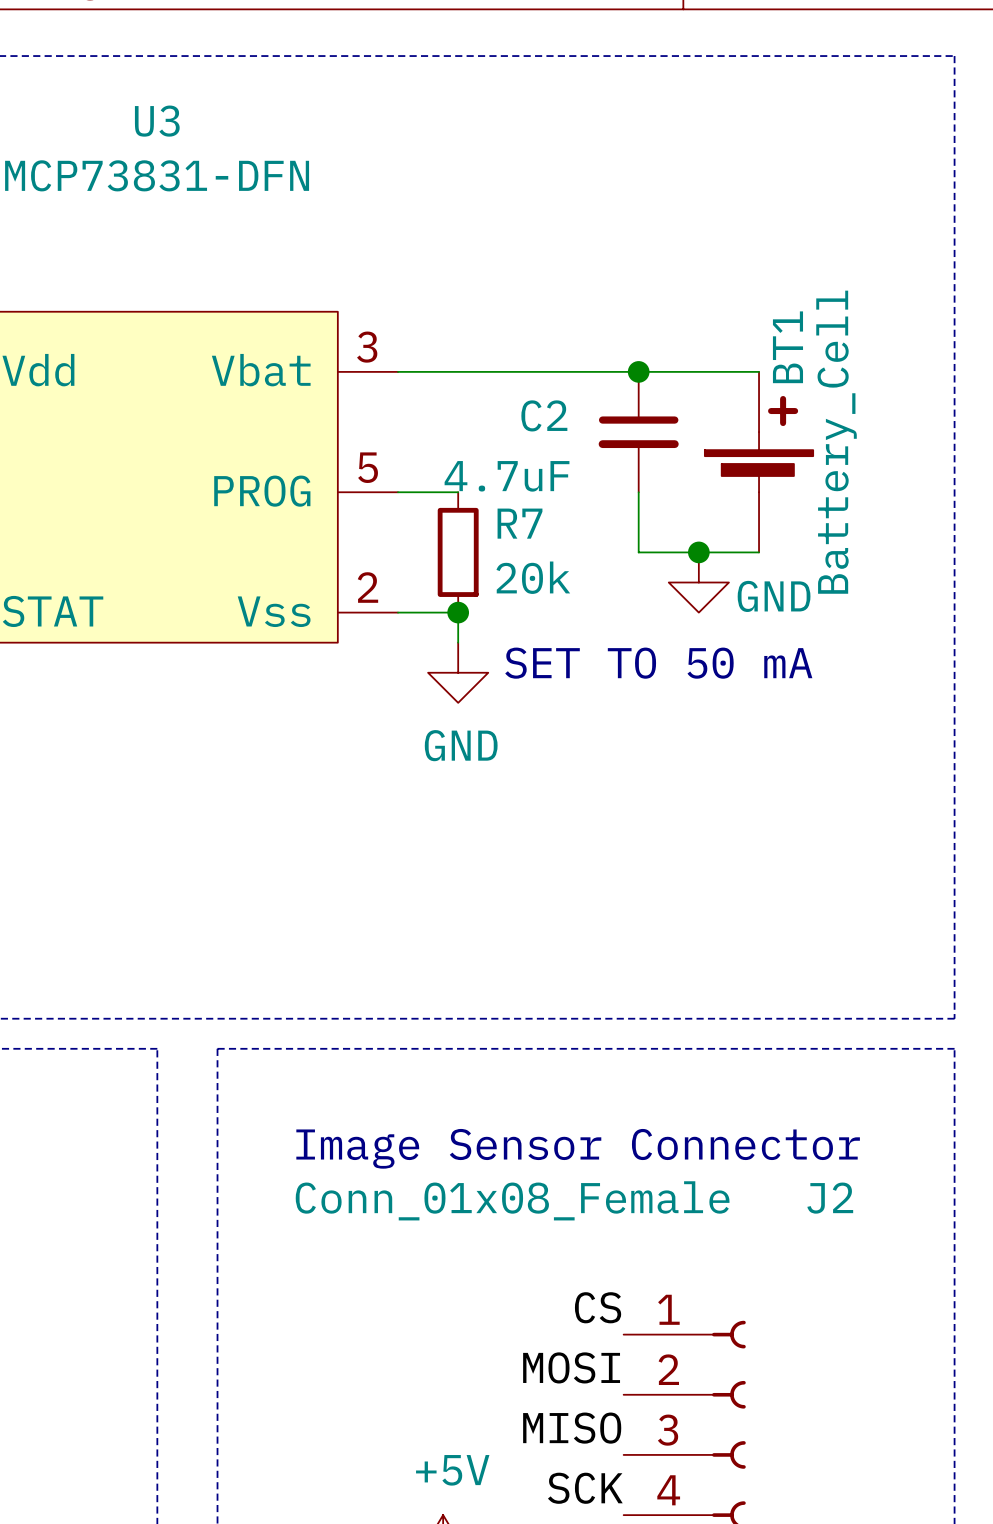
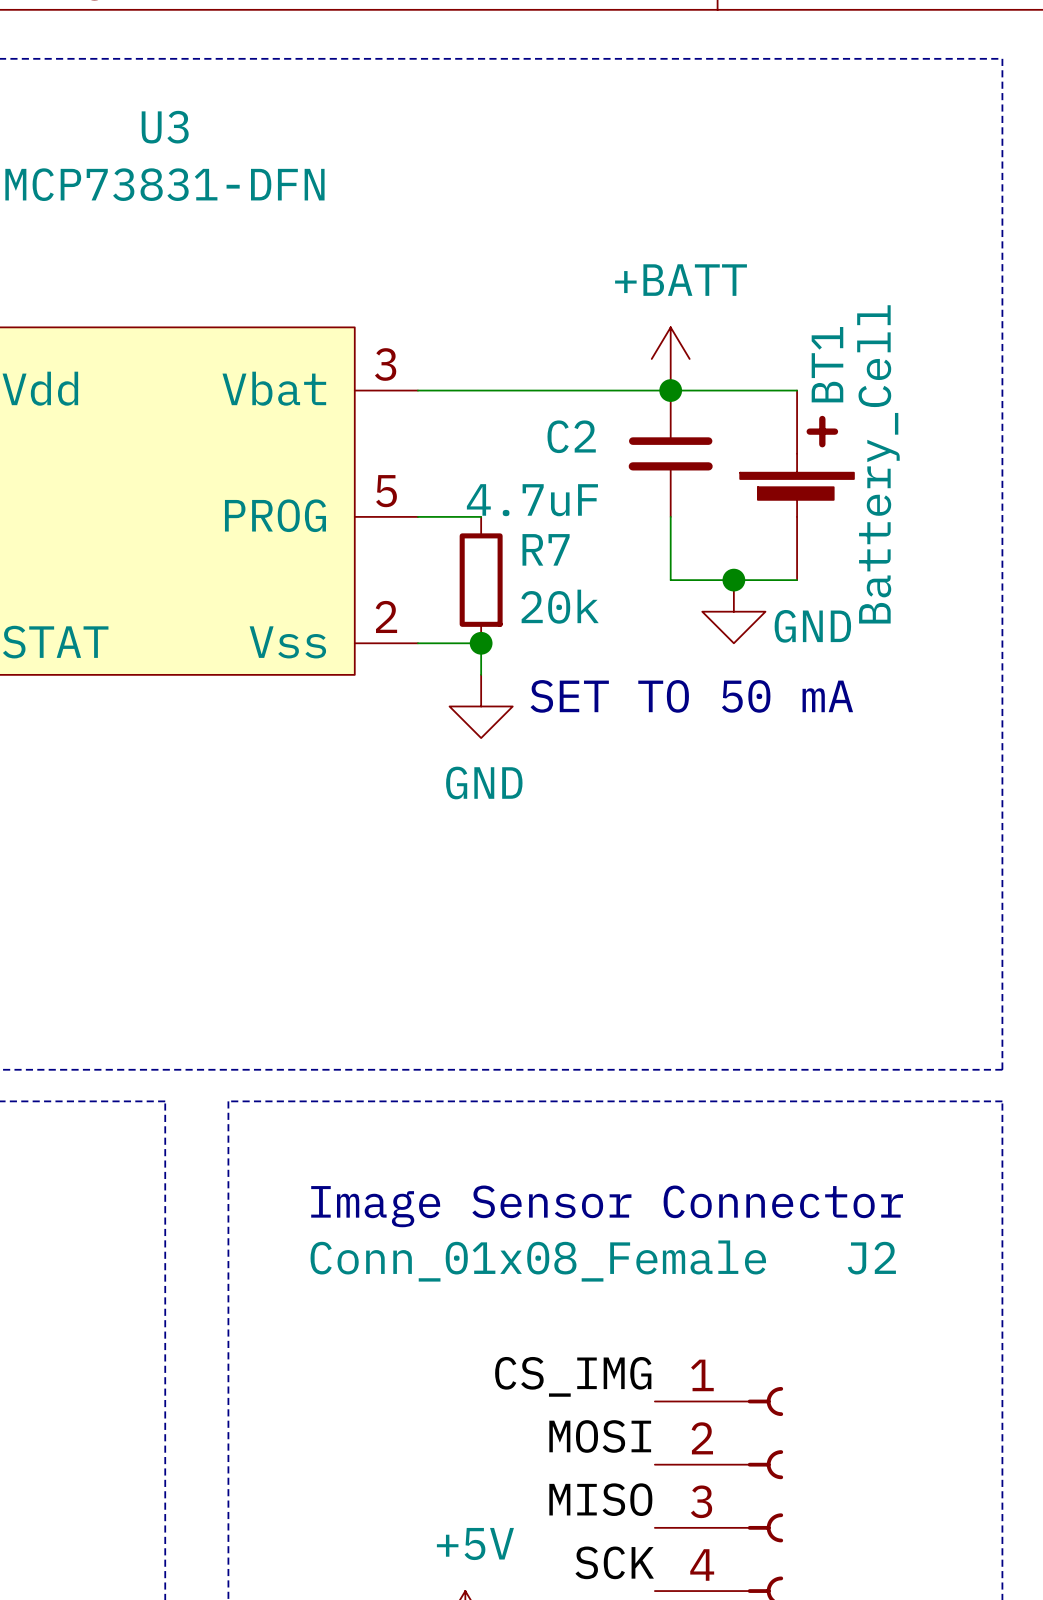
power symbol: none -> +BATT (670, 358)
label: CS (598, 1307) -> CS_IMG (573, 1376)

